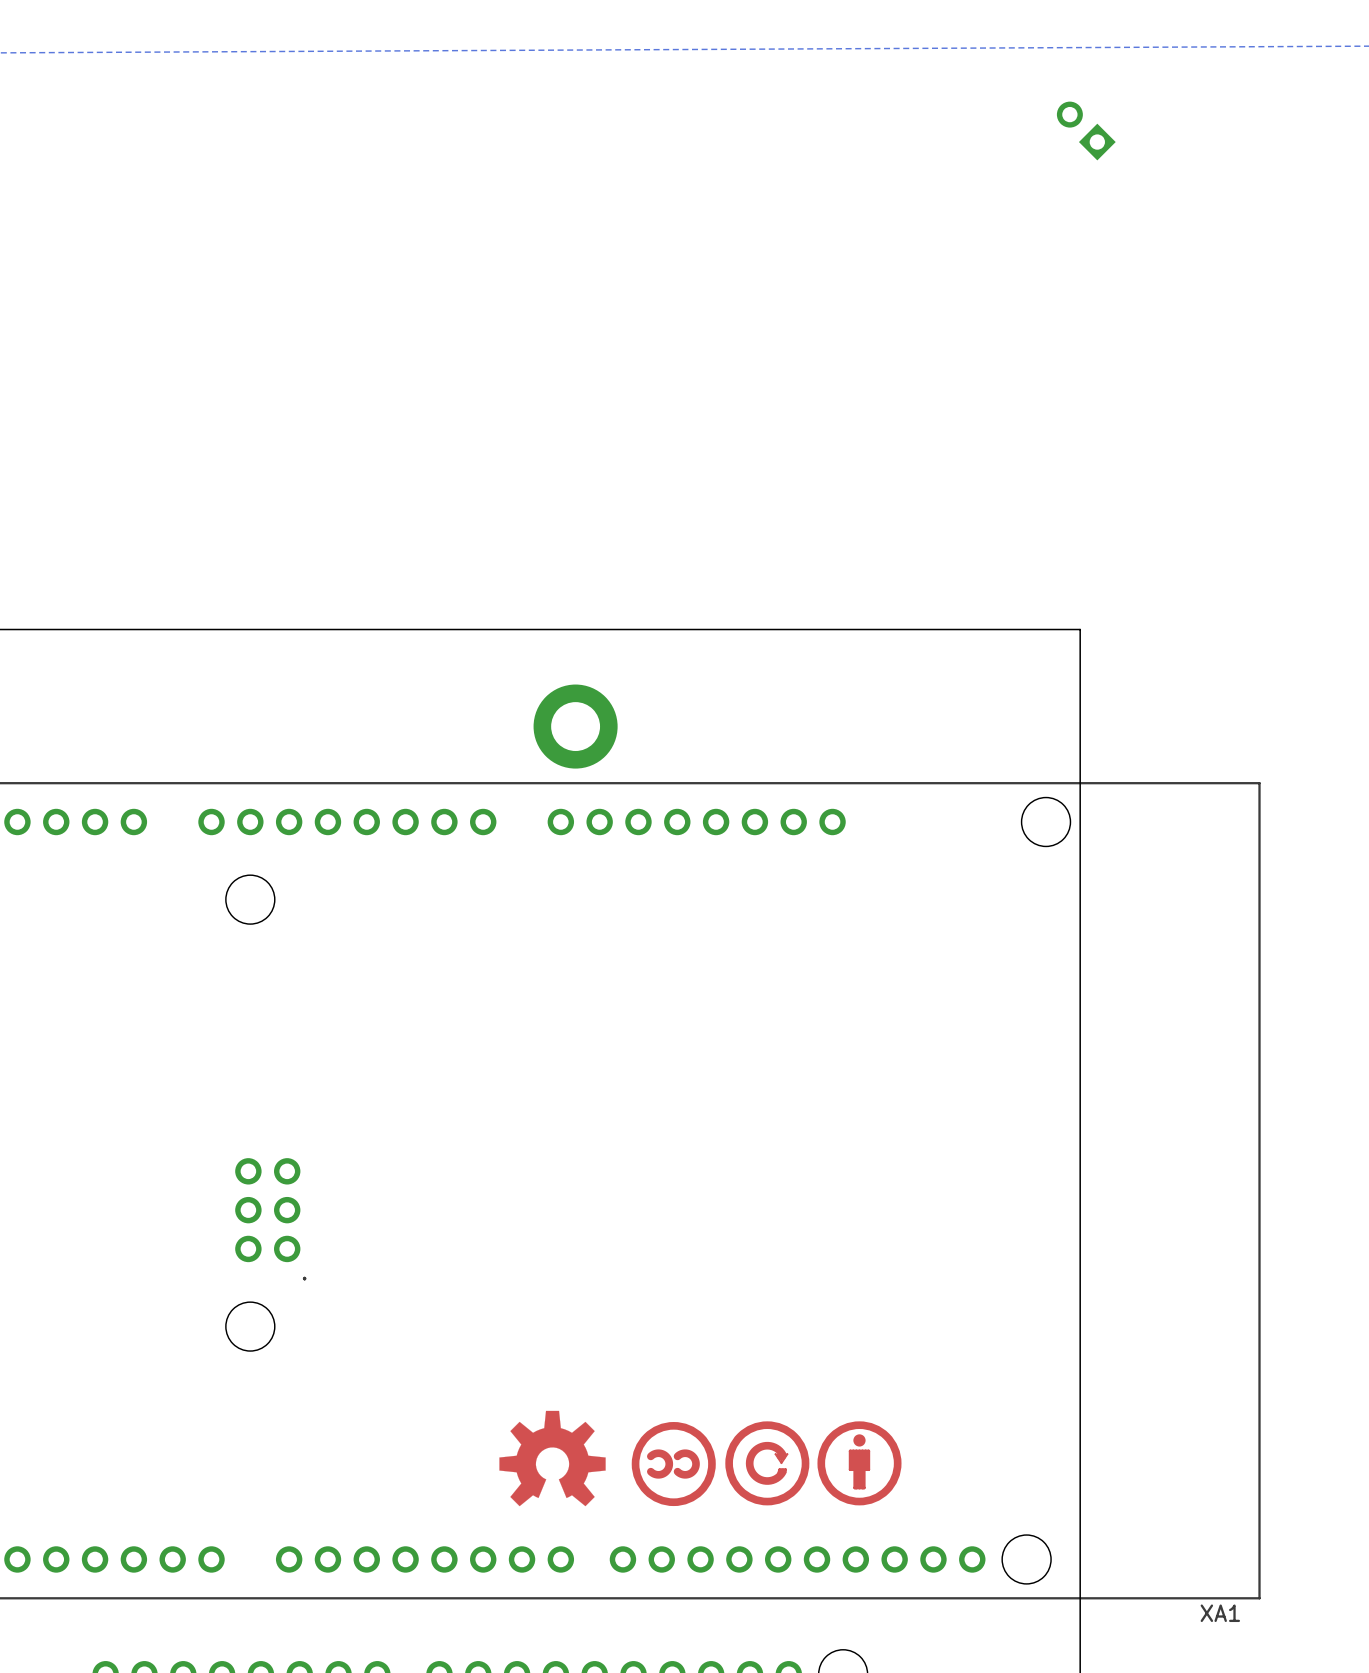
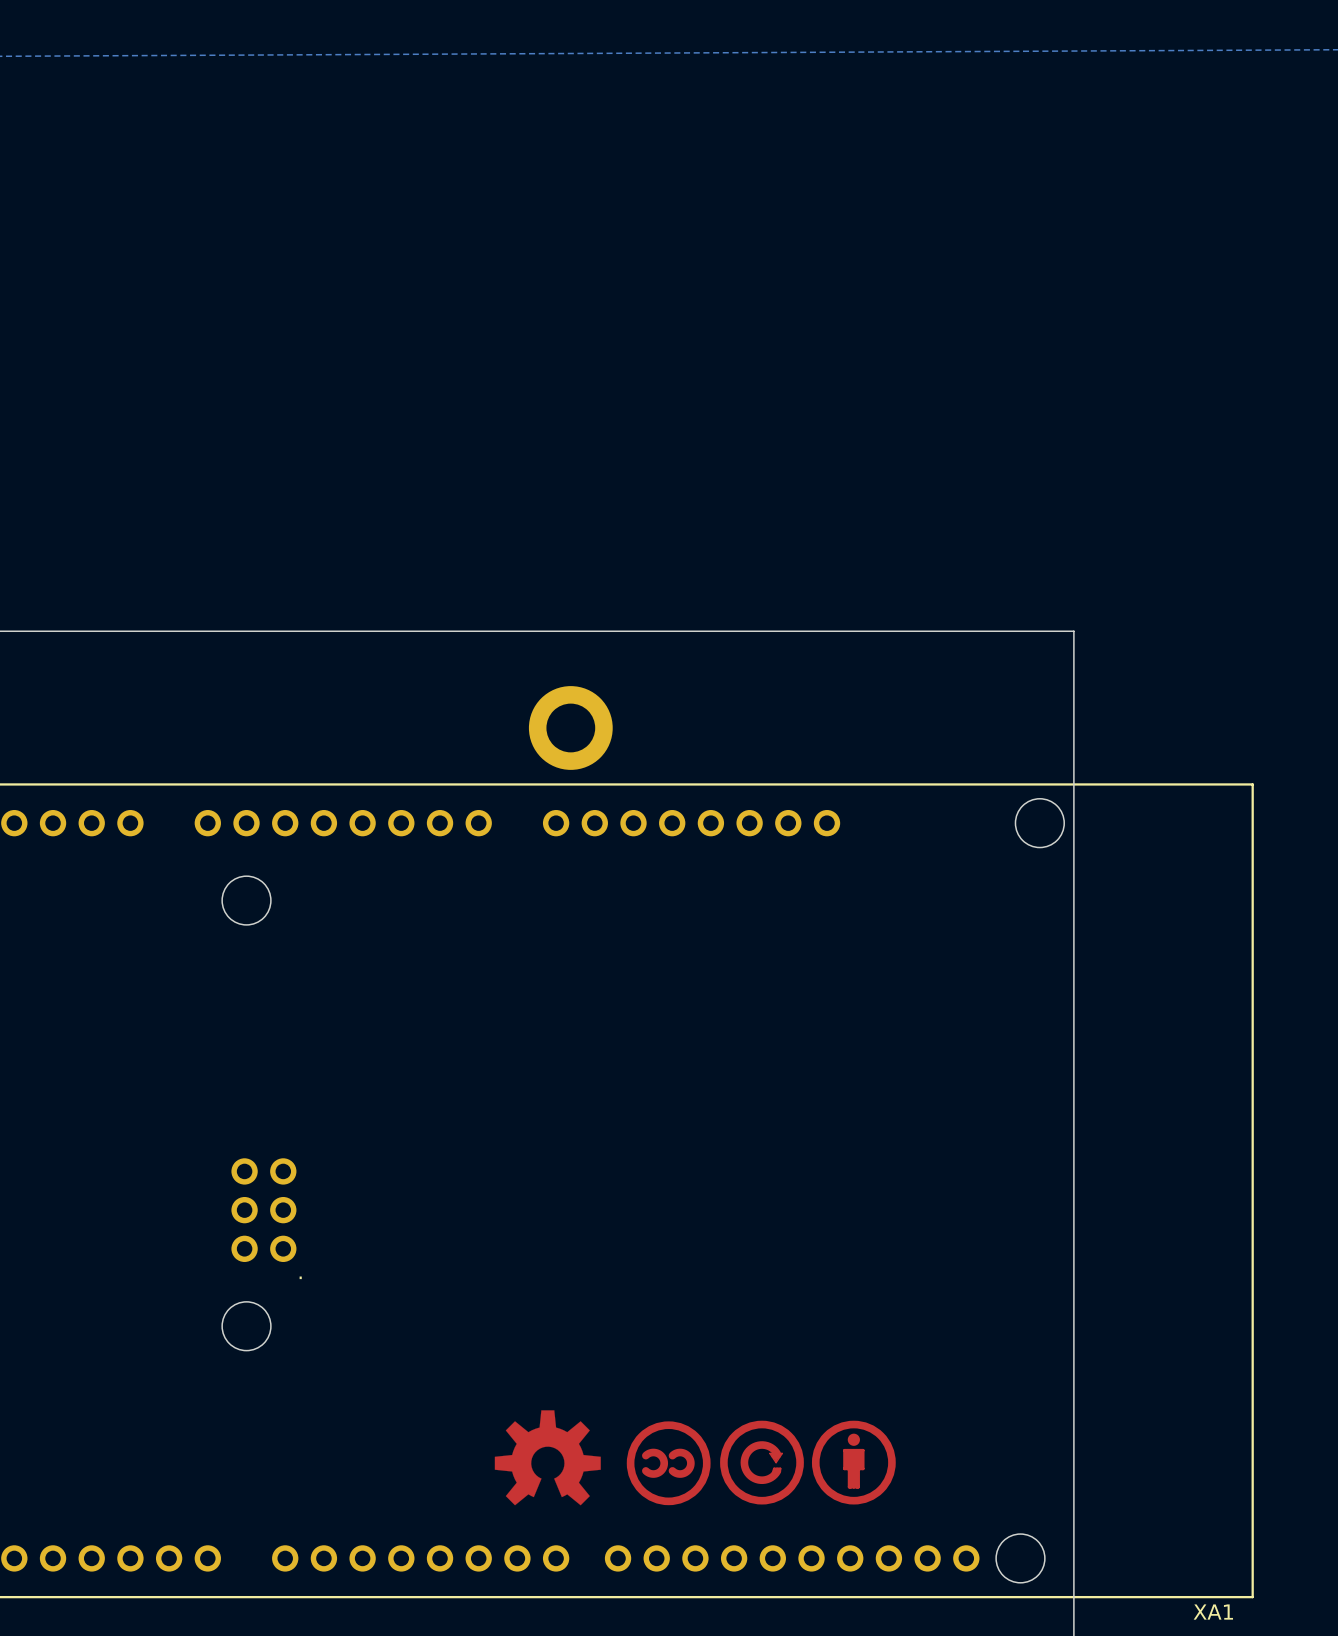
part: (1086, 131) -> none

